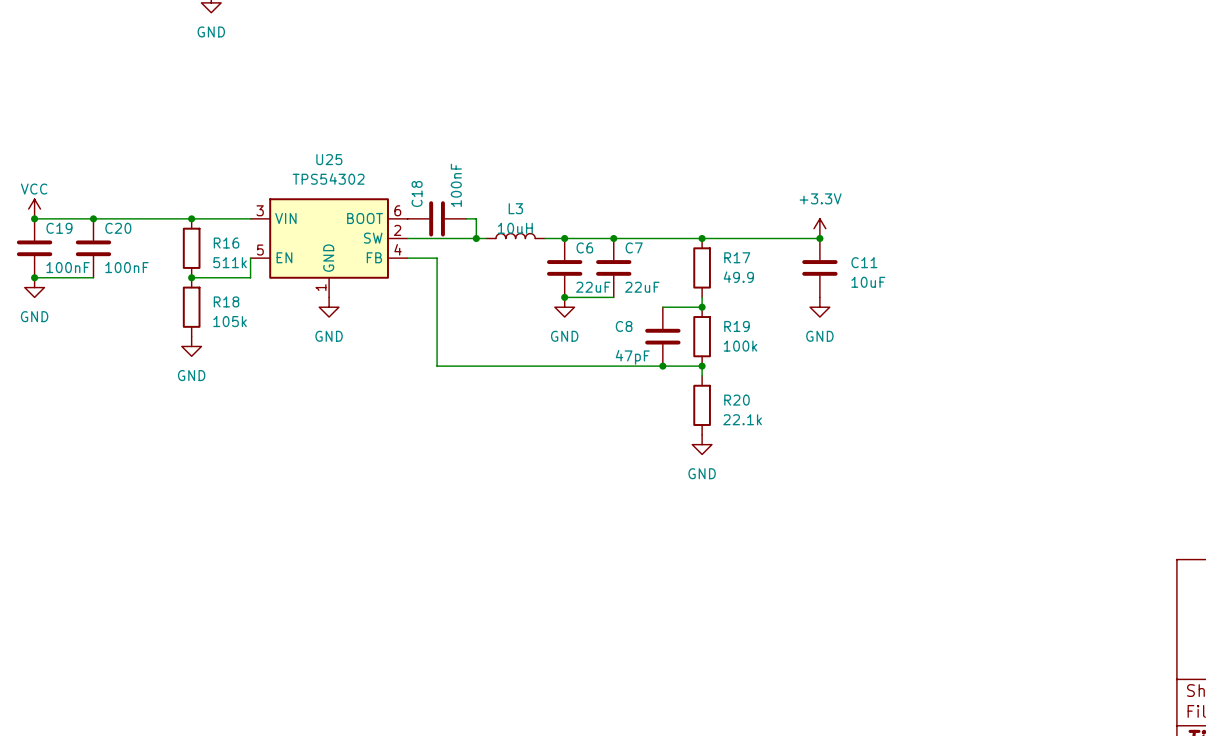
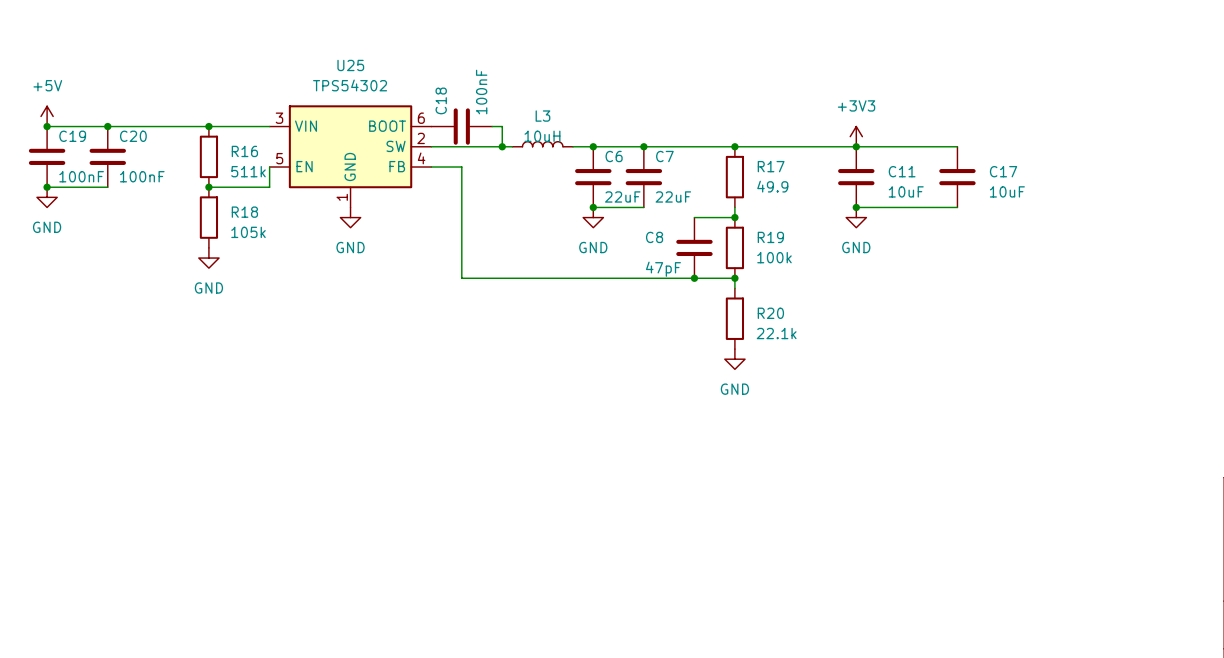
power symbol: VCC (34, 209) -> +5V (47, 116)
power symbol: +3.3V (819, 228) -> +3V3 (856, 136)
wire: none -> (856, 146) (957, 146)
C17: none -> 10uF (957, 177)
wire: none -> (856, 207) (957, 207)
junction: none -> (856, 207)

